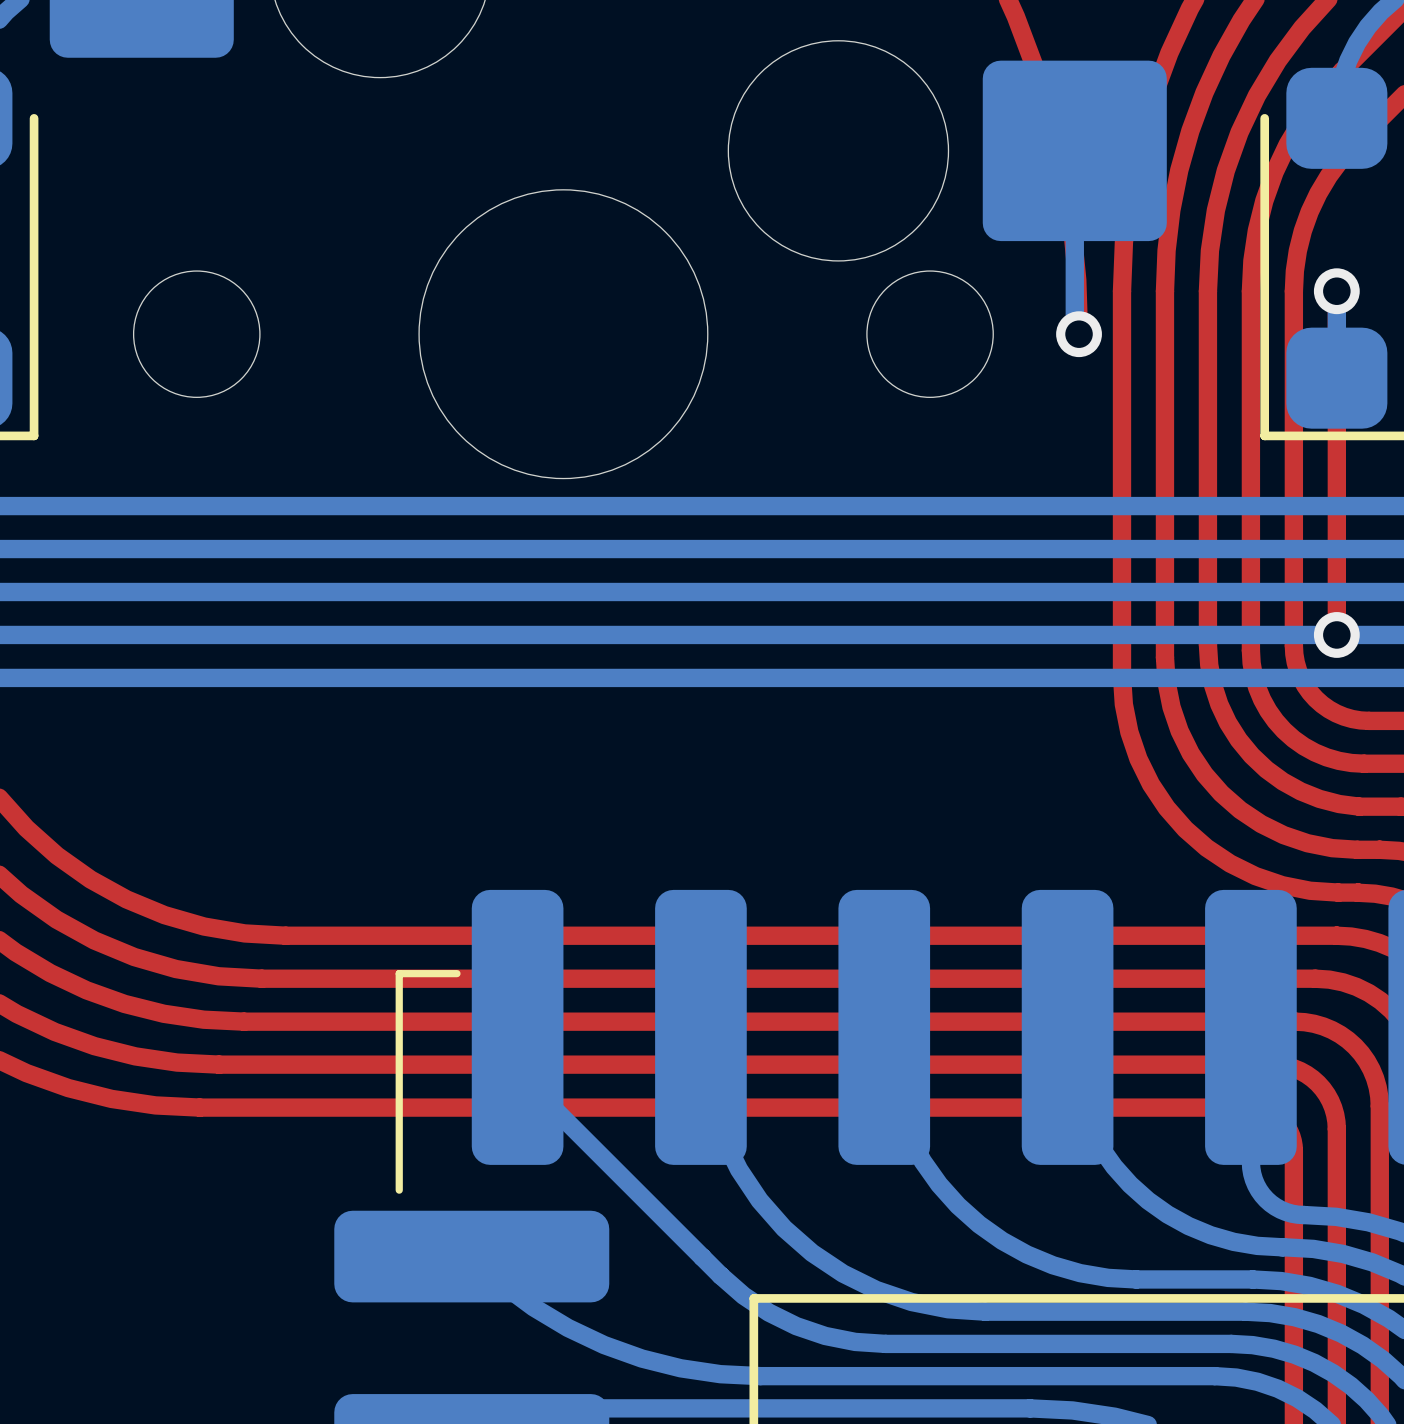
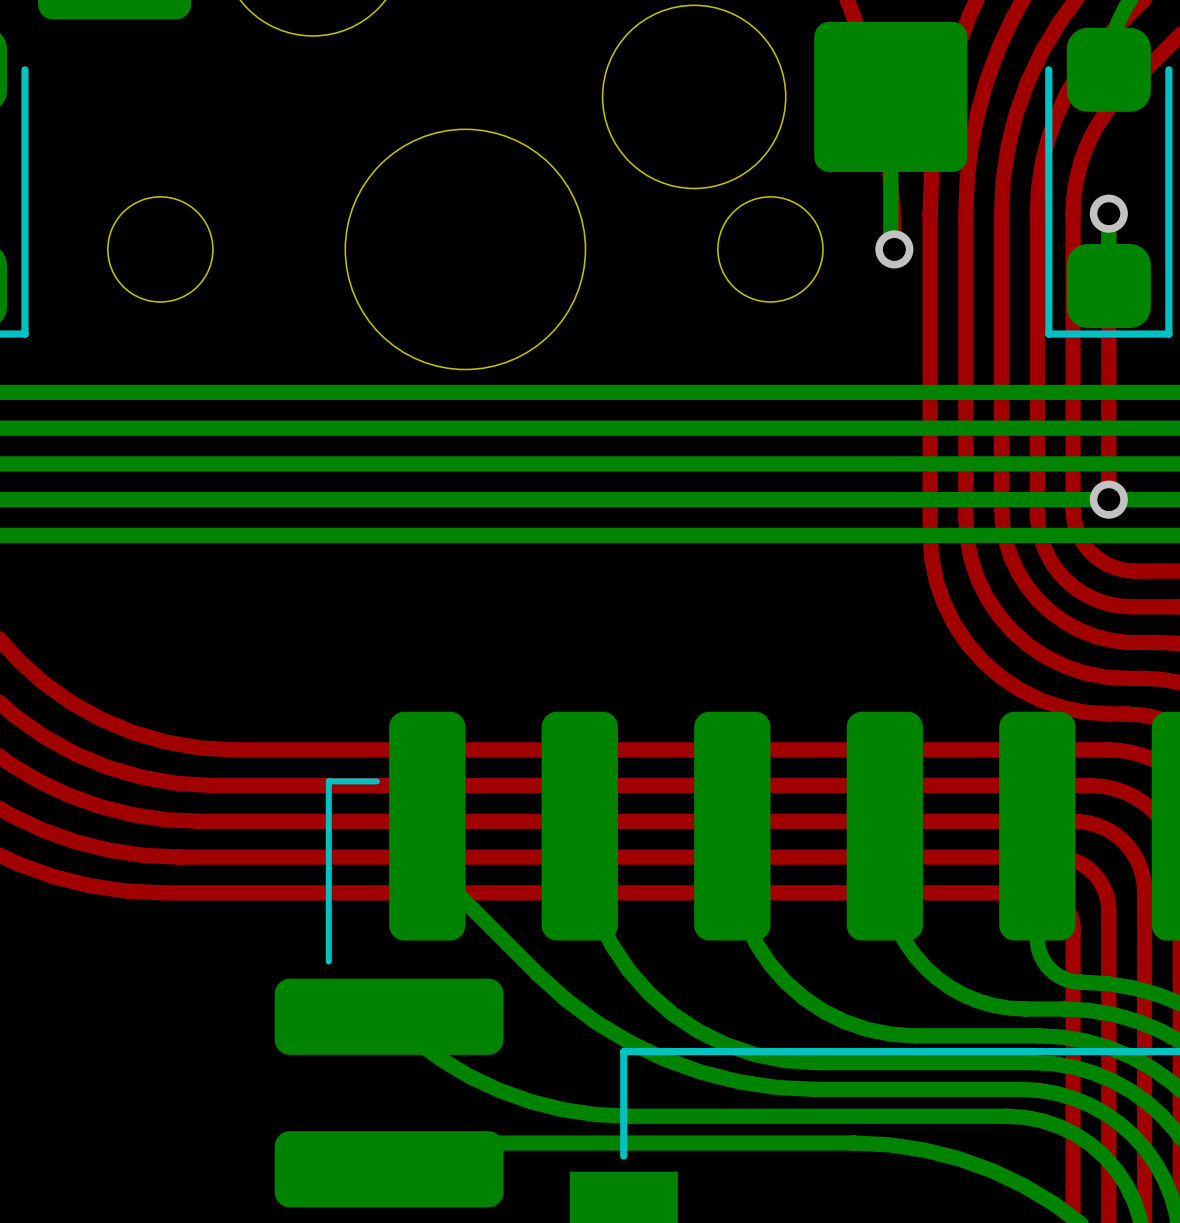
bottom track: (884, 1027) (885, 1055) (890, 1083) (898, 1110) (909, 1136) (922, 1161) (939, 1184) (958, 1205) (979, 1224) (1002, 1240) (1026, 1254) (1053, 1265) (1080, 1273) (1108, 1277) (1136, 1279) -> (732, 826) (733, 876) (738, 900) (746, 922) (756, 944) (770, 964) (785, 982) (803, 998) (823, 1011) (845, 1021) (867, 1029) (891, 1034) (942, 1035)
bottom track: (1067, 1033) (1072, 1081) (1088, 1126) (1100, 1147) (1130, 1184) (1167, 1214) (1210, 1235) (1257, 1245) (1283, 1247) -> (884, 831) (885, 884) (892, 915) (906, 943) (925, 967) (950, 987) (978, 1001) (1009, 1008) (1064, 1009)
bottom track: (650, 1205) (720, 1275) (743, 1295) (769, 1312) (796, 1326) (825, 1335) (855, 1341) (885, 1343) (985, 1343) -> (537, 974) (566, 999) (597, 1023) (630, 1042) (665, 1059) (701, 1072) (739, 1081) (777, 1087) (816, 1089)

